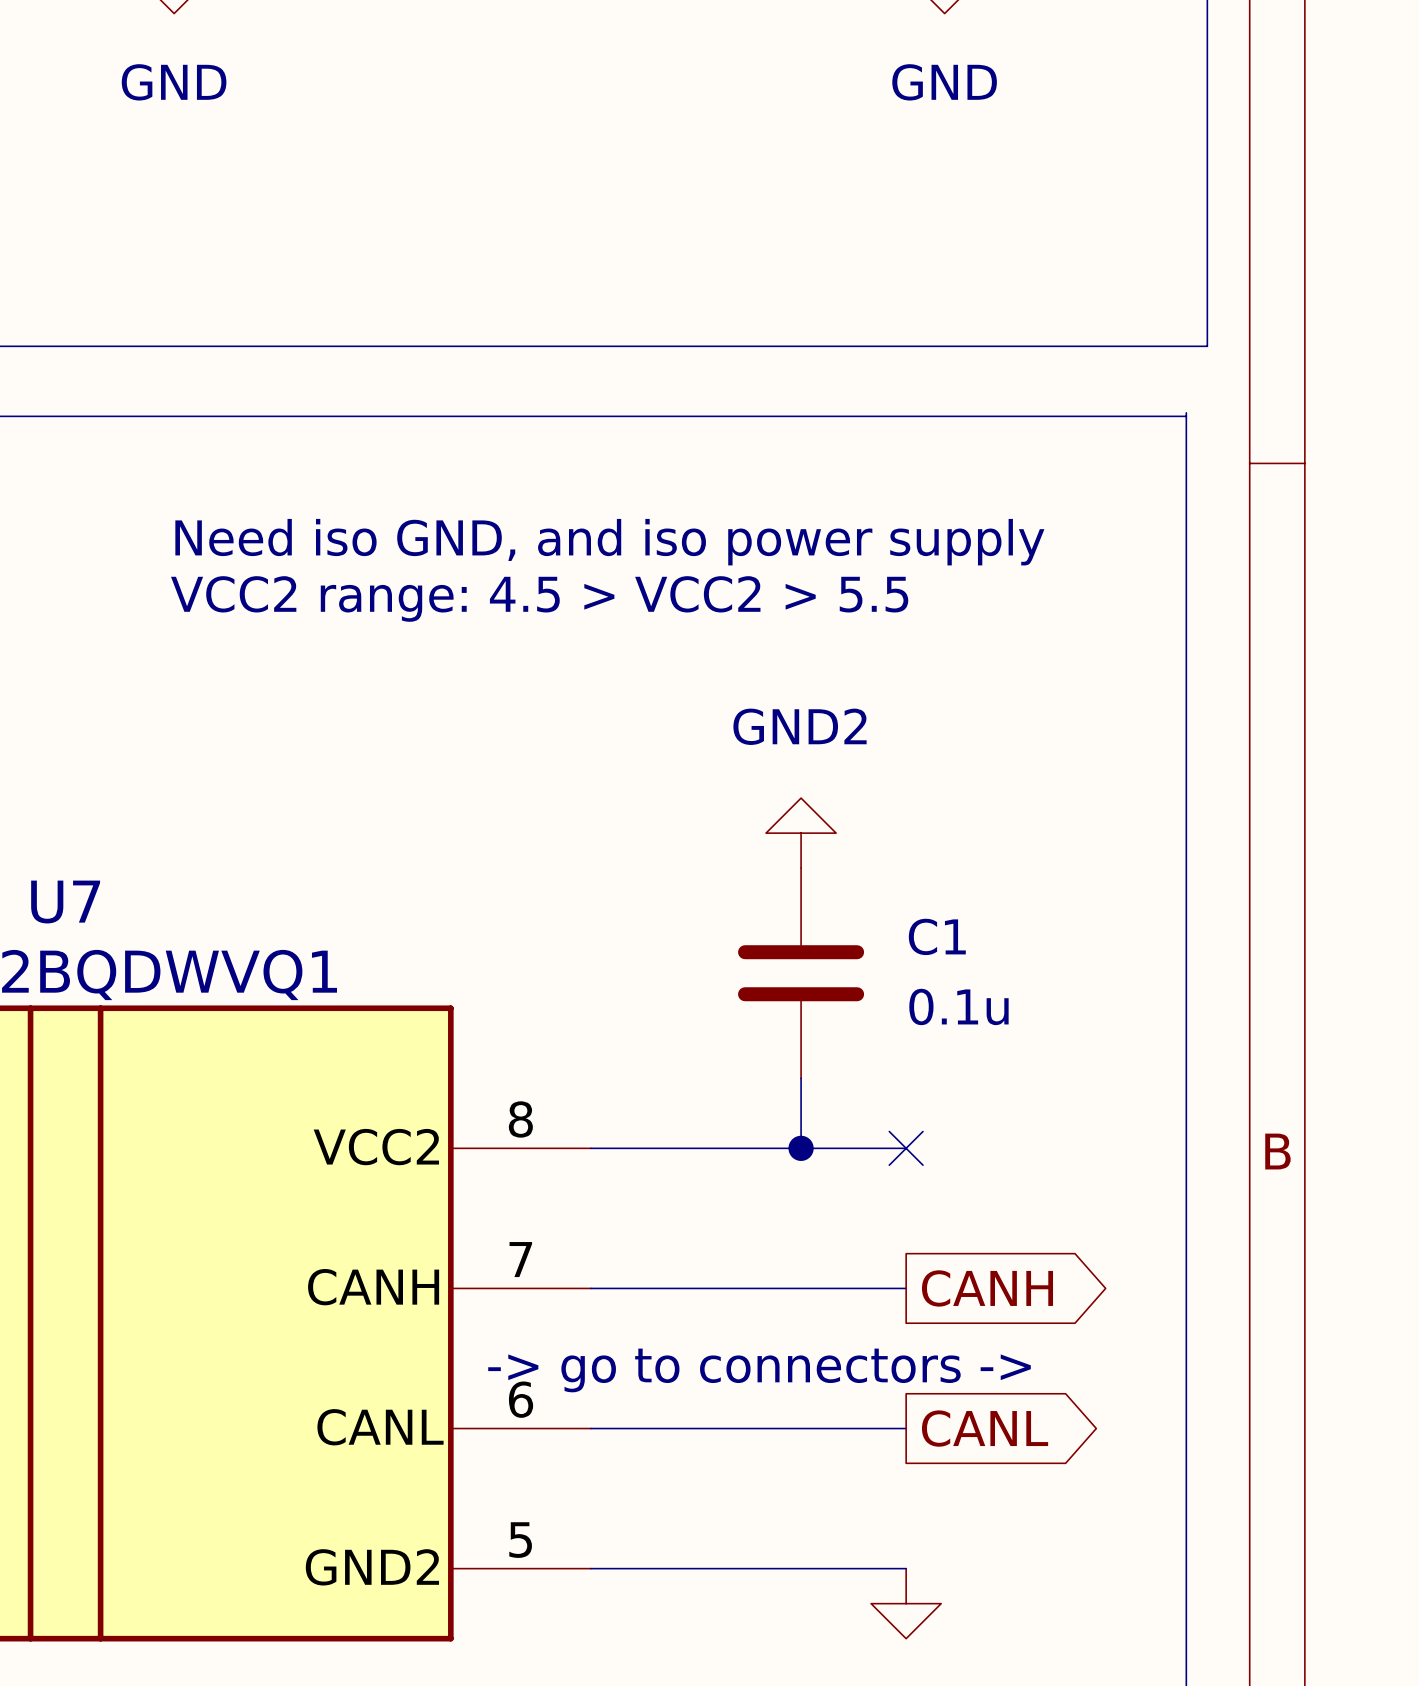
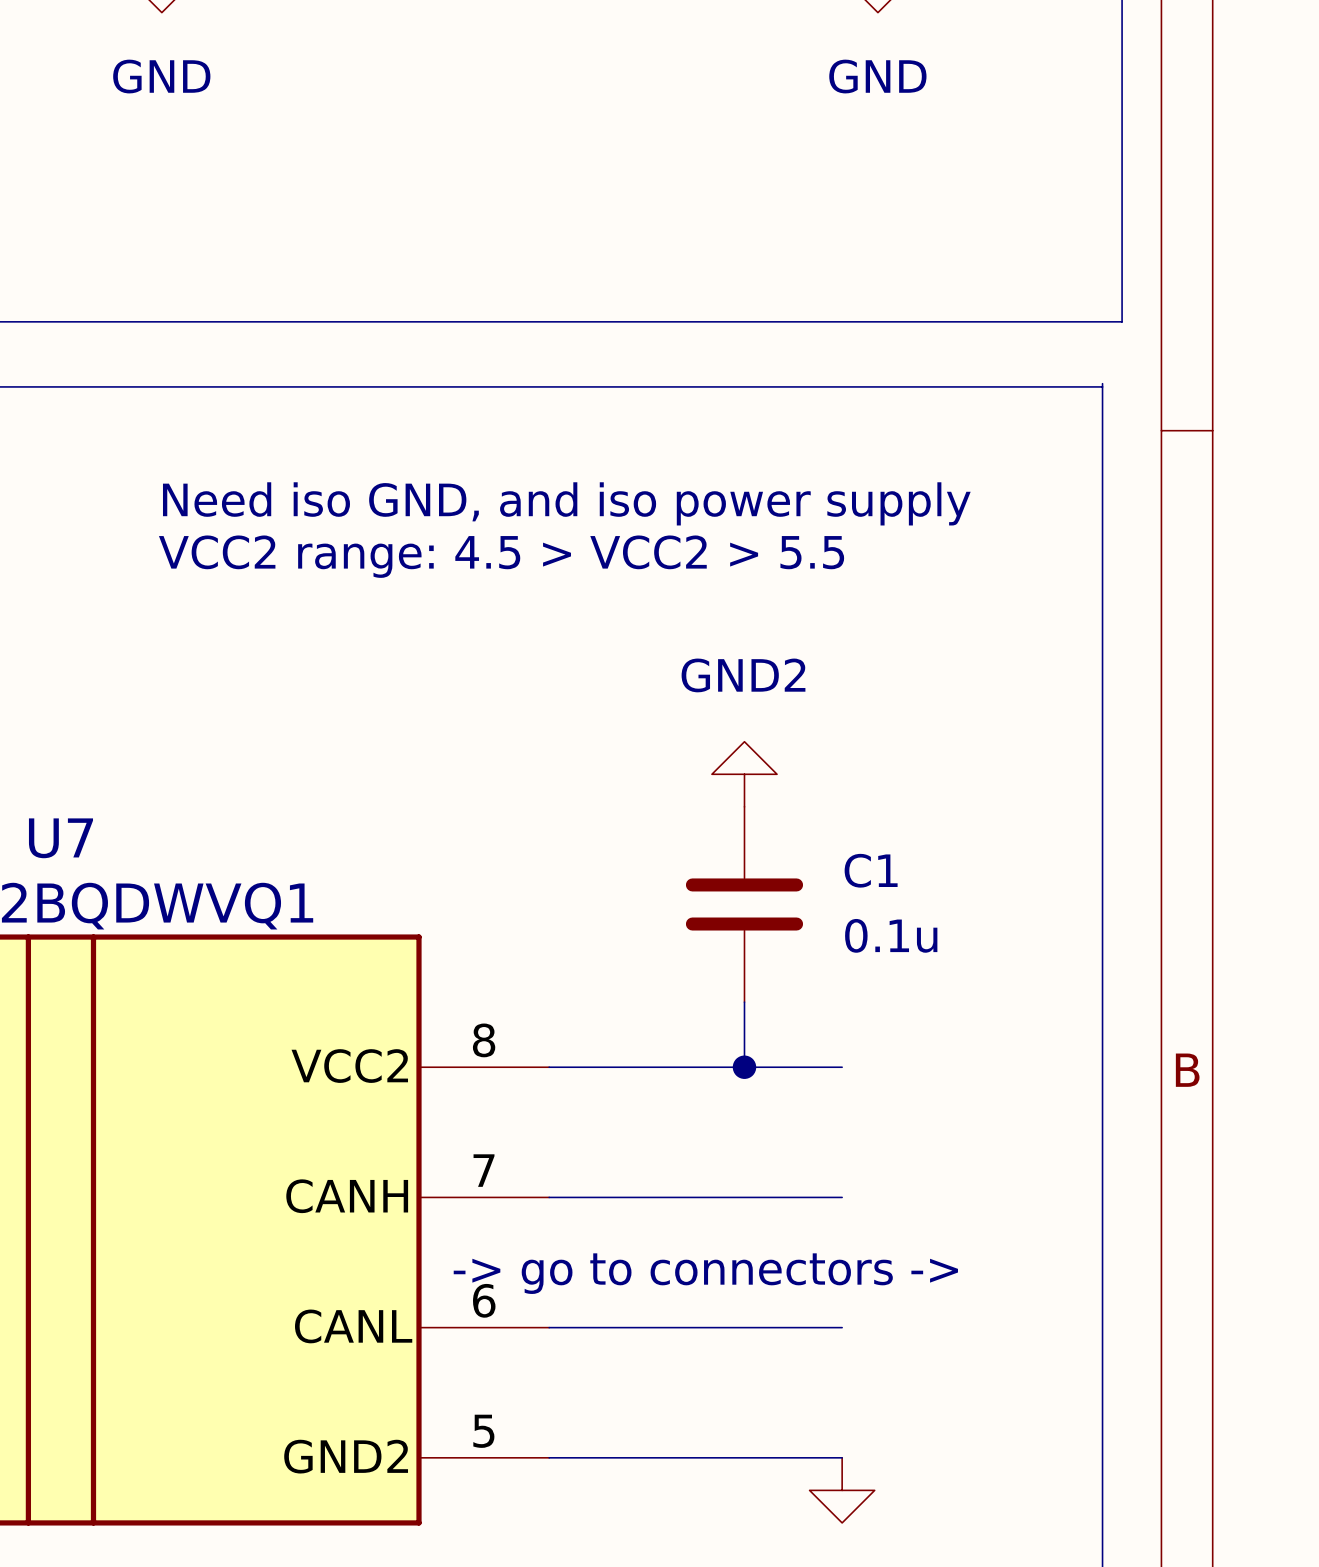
no-connect mark: (906, 1148) -> none
global label: CANH (987, 1288) -> none
global label: CANL (985, 1428) -> none

